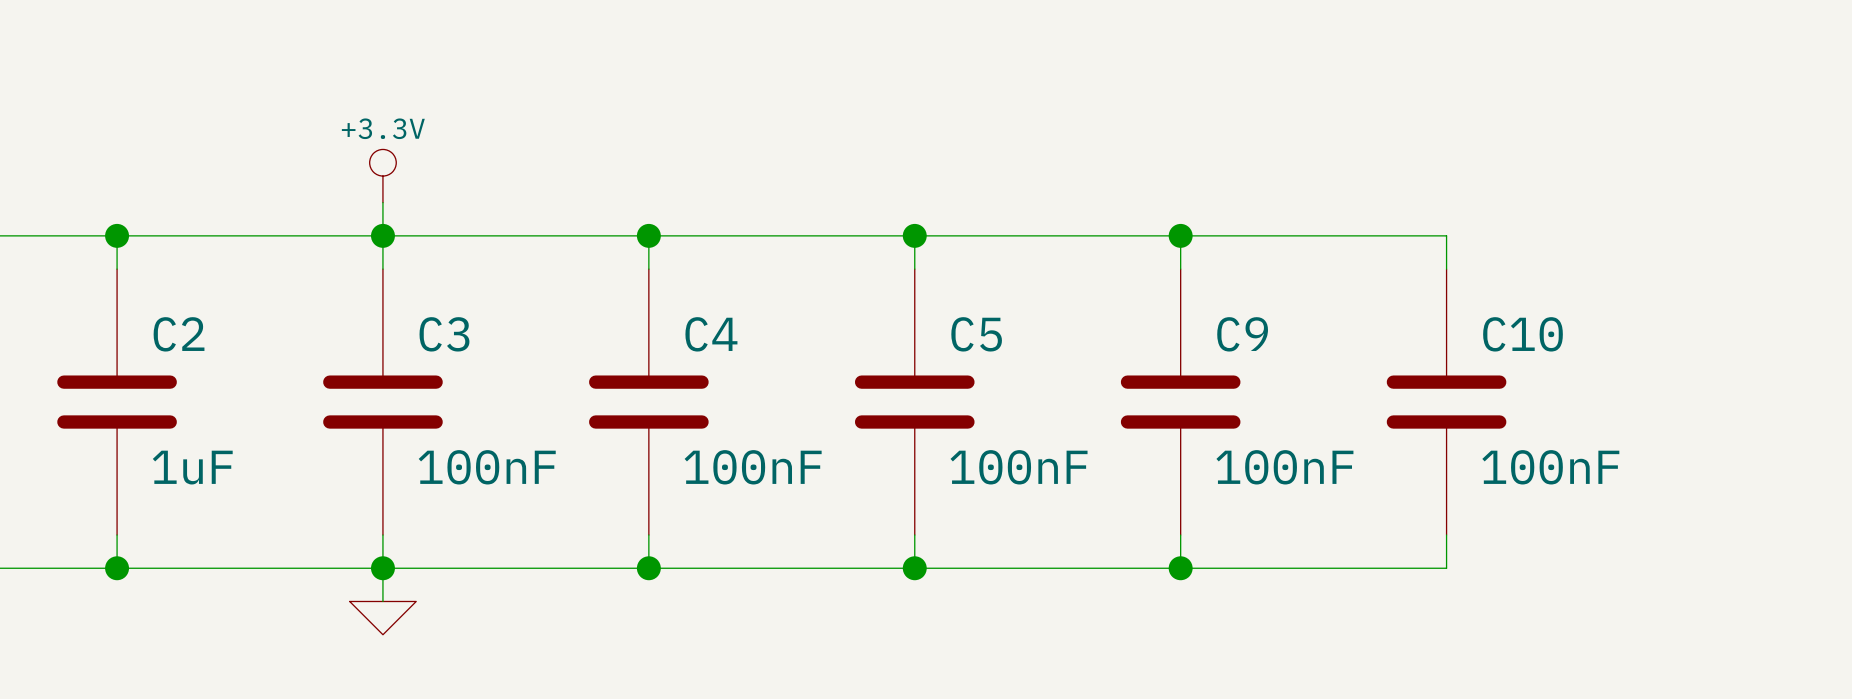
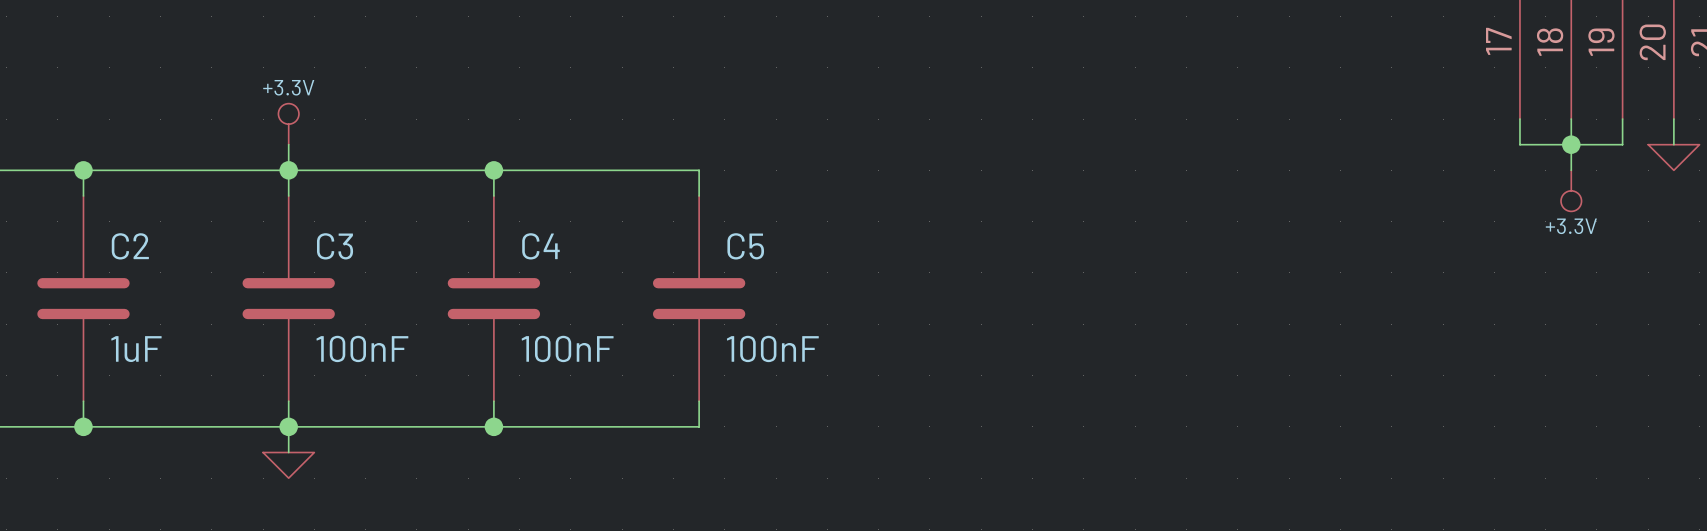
wire: (914, 235) (1446, 235) (1446, 269) -> none
junction: (914, 235) -> none
wire: (1180, 235) (1180, 269) -> none
junction: (1180, 235) -> none
C9: 100nF (1180, 402) -> none
C10: 100nF (1446, 402) -> none
wire: (1180, 535) (1180, 568) -> none
wire: (1446, 535) (1446, 568) (914, 568) -> none
junction: (914, 568) -> none
junction: (1180, 568) -> none

